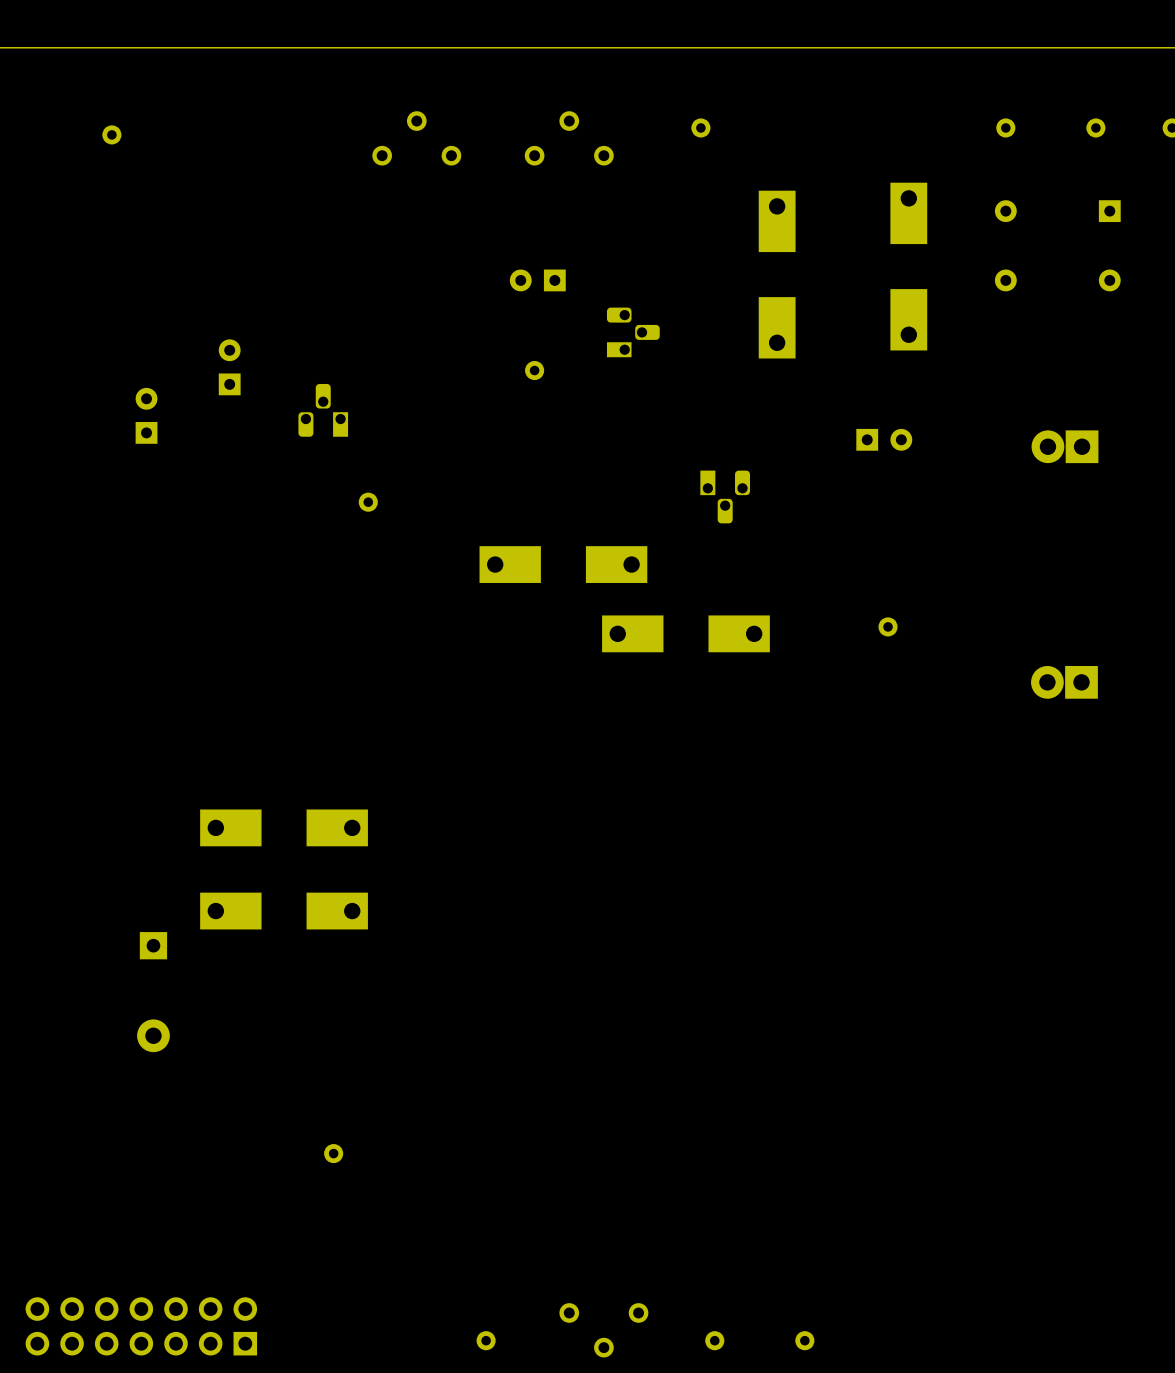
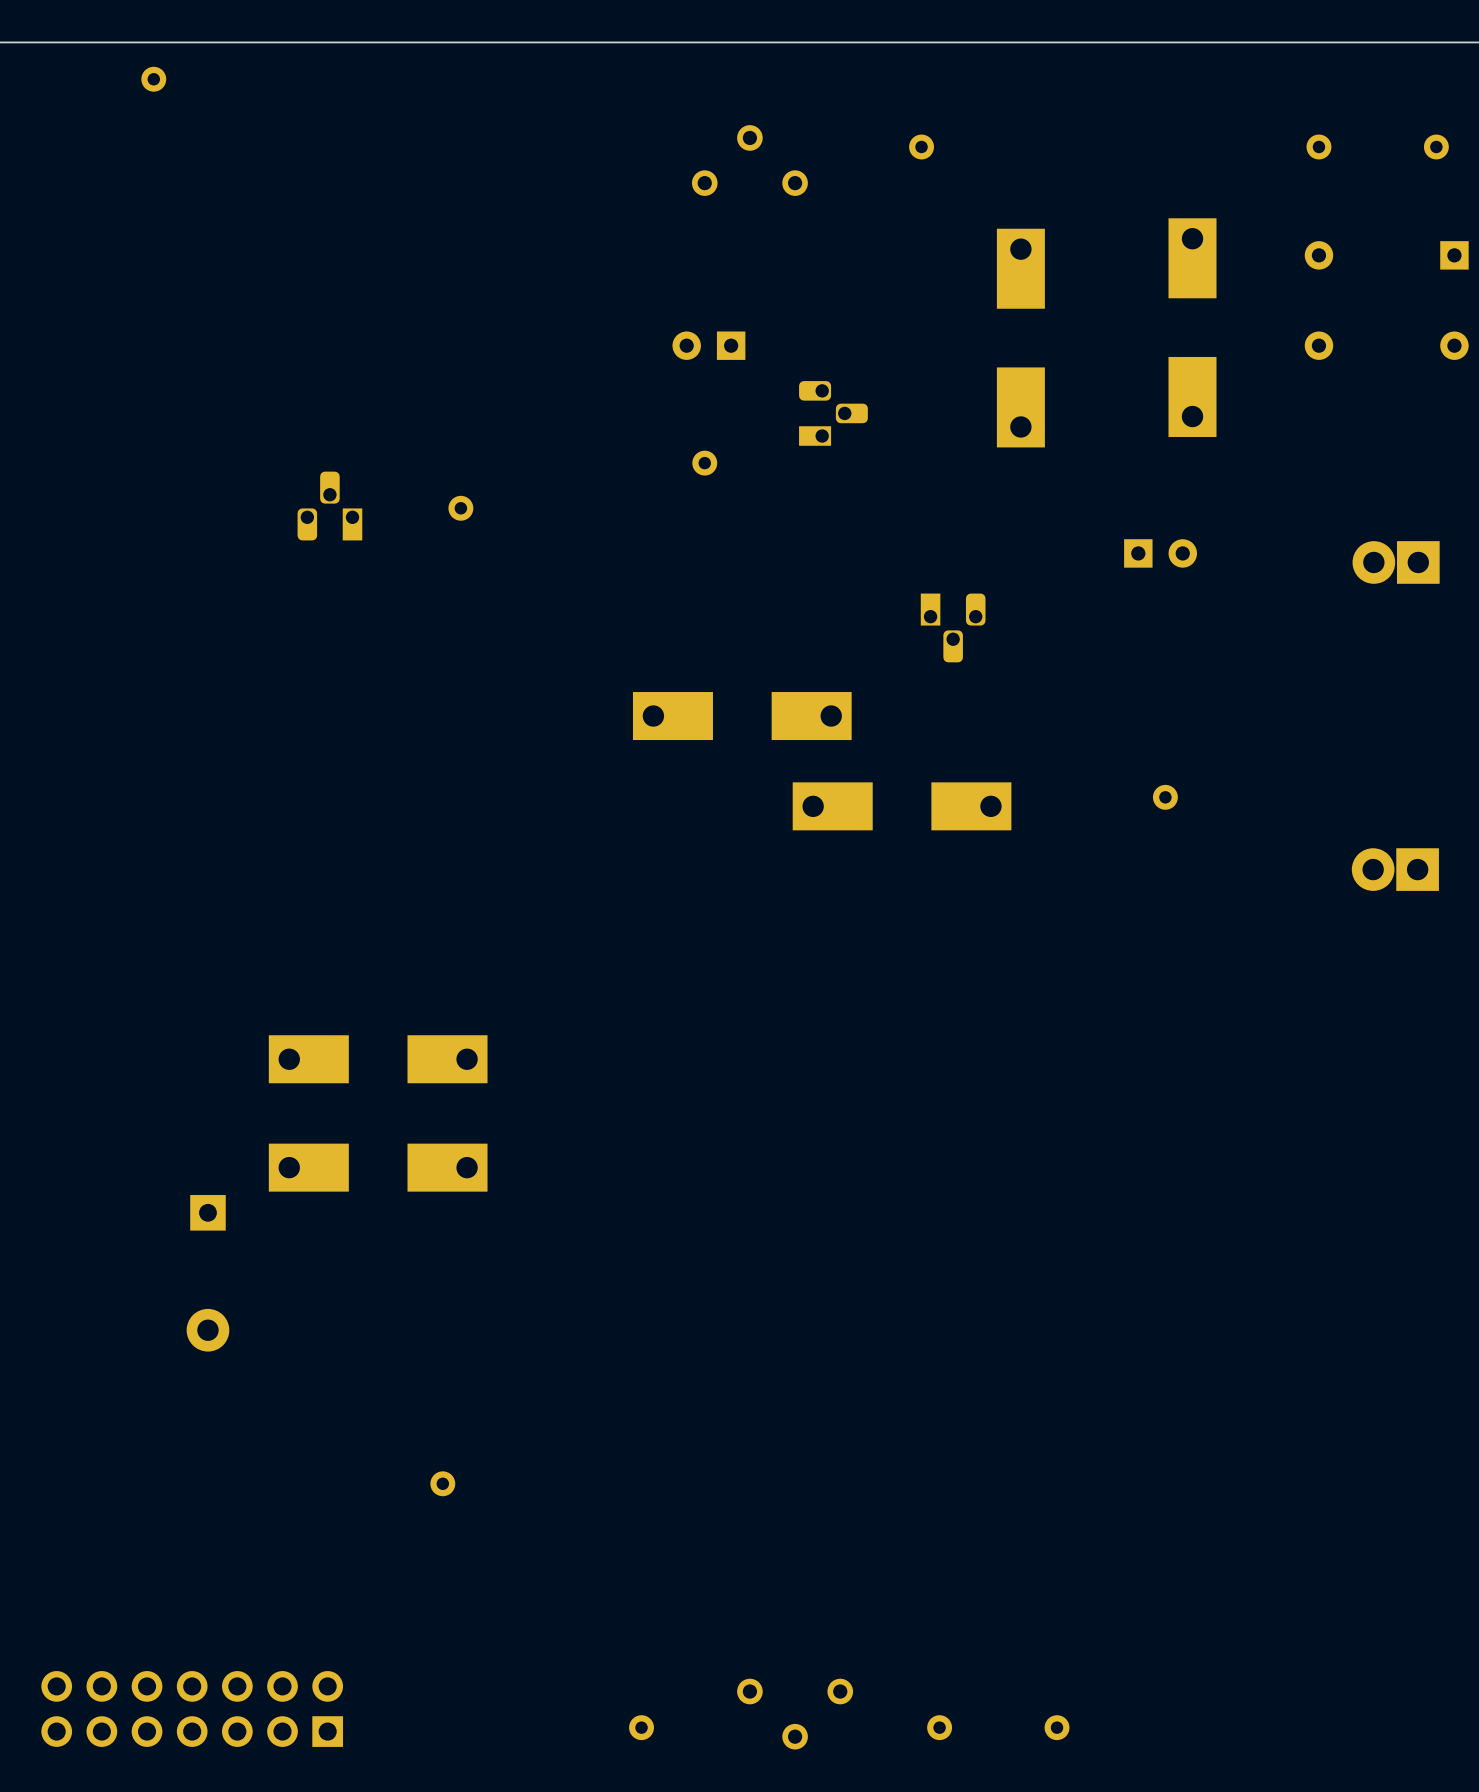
part position: (111, 134) -> (153, 79)
part: (416, 138) -> none
part: (229, 367) -> none
part position: (323, 410) -> (329, 506)
part: (146, 415) -> none
part position: (368, 502) -> (460, 508)

